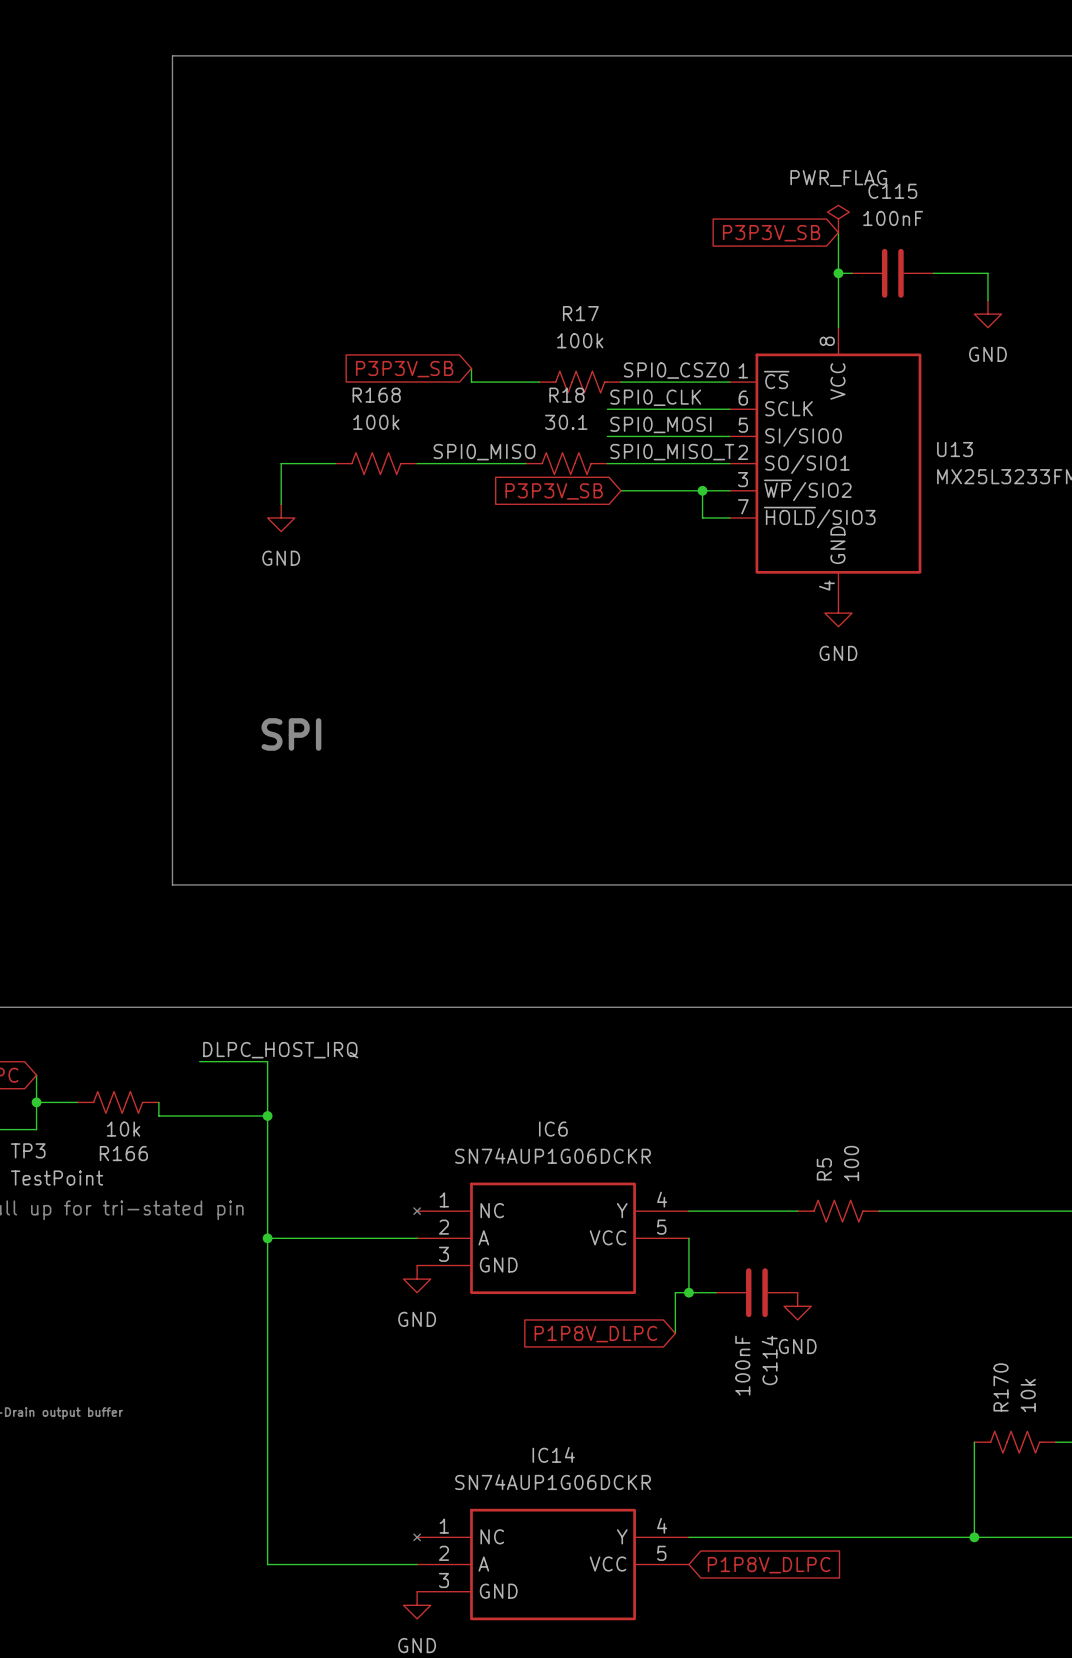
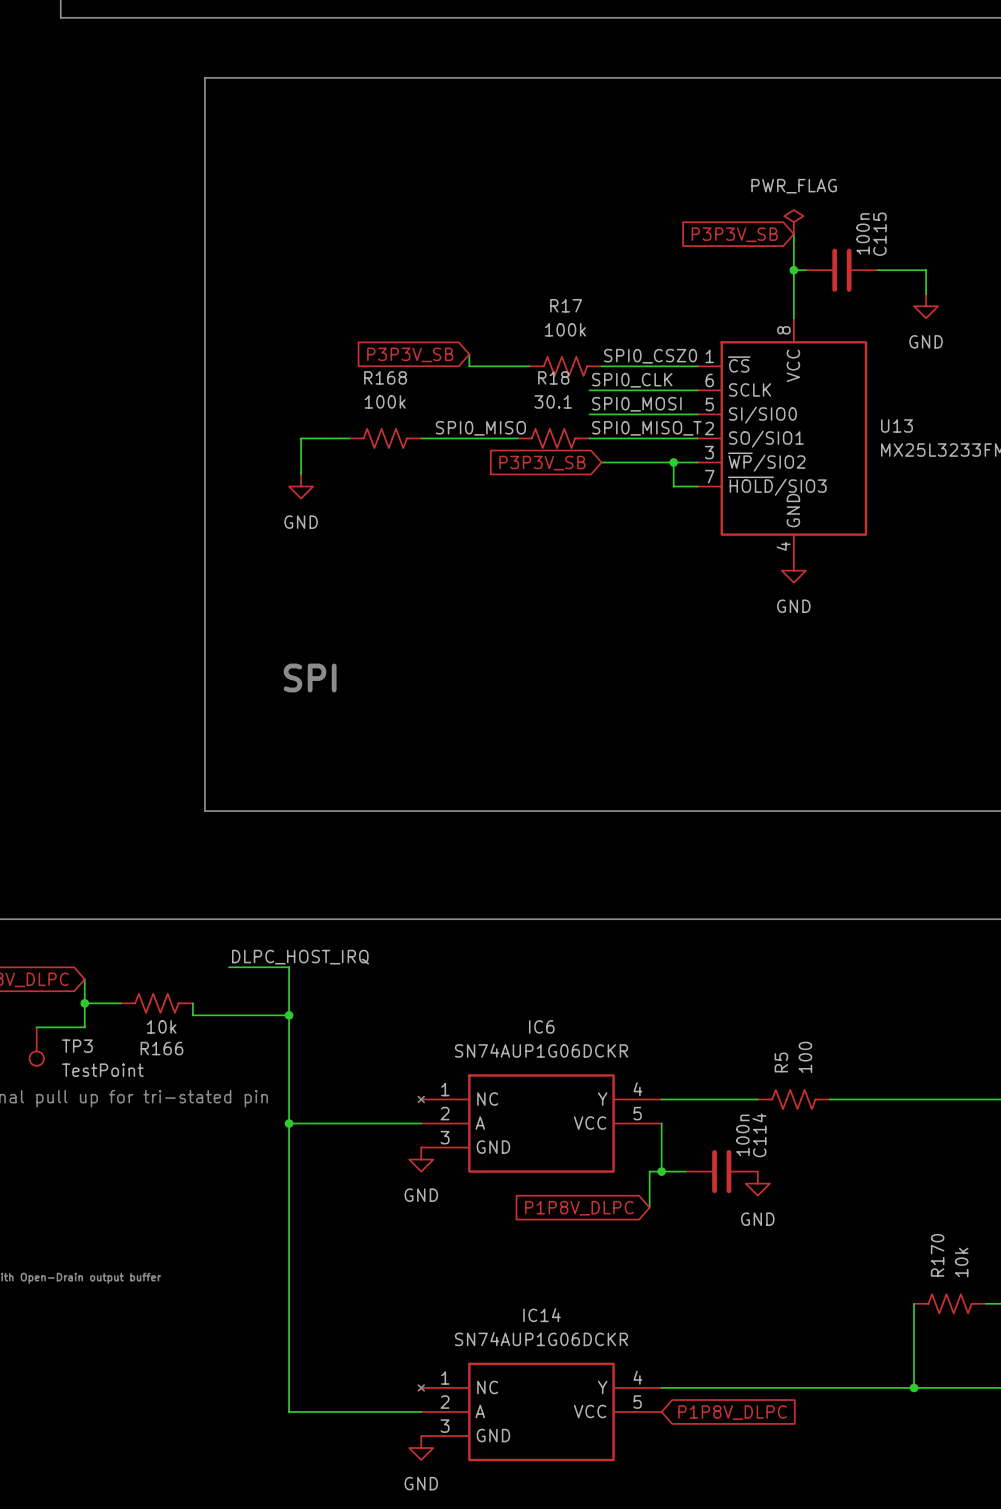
C115 name rotation: 0° (892, 191) -> 90° counterclockwise (879, 234)
C115 name position: C115 (892, 191) -> C115 (879, 234)
C115 value: 100nF (893, 218) -> 100n (863, 233)
C114 name position: C114 (769, 1360) -> C114 (759, 1135)
C114 value: 100nF (742, 1365) -> 100n (742, 1135)

